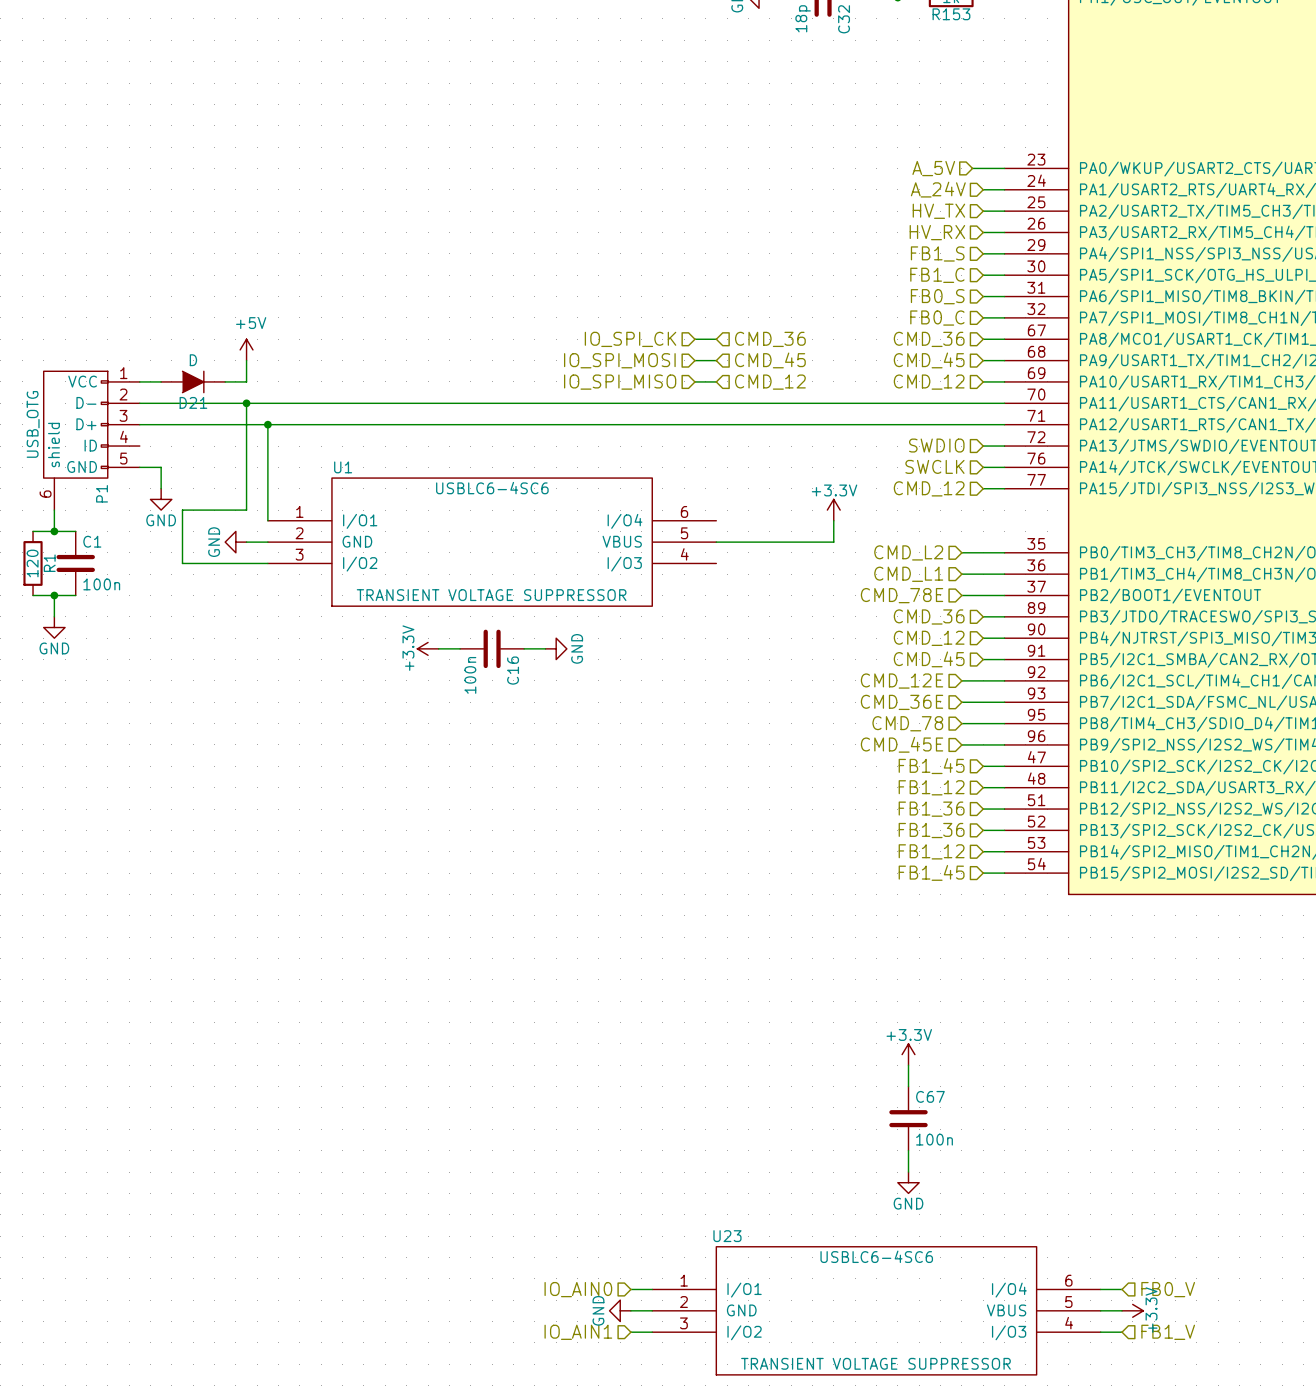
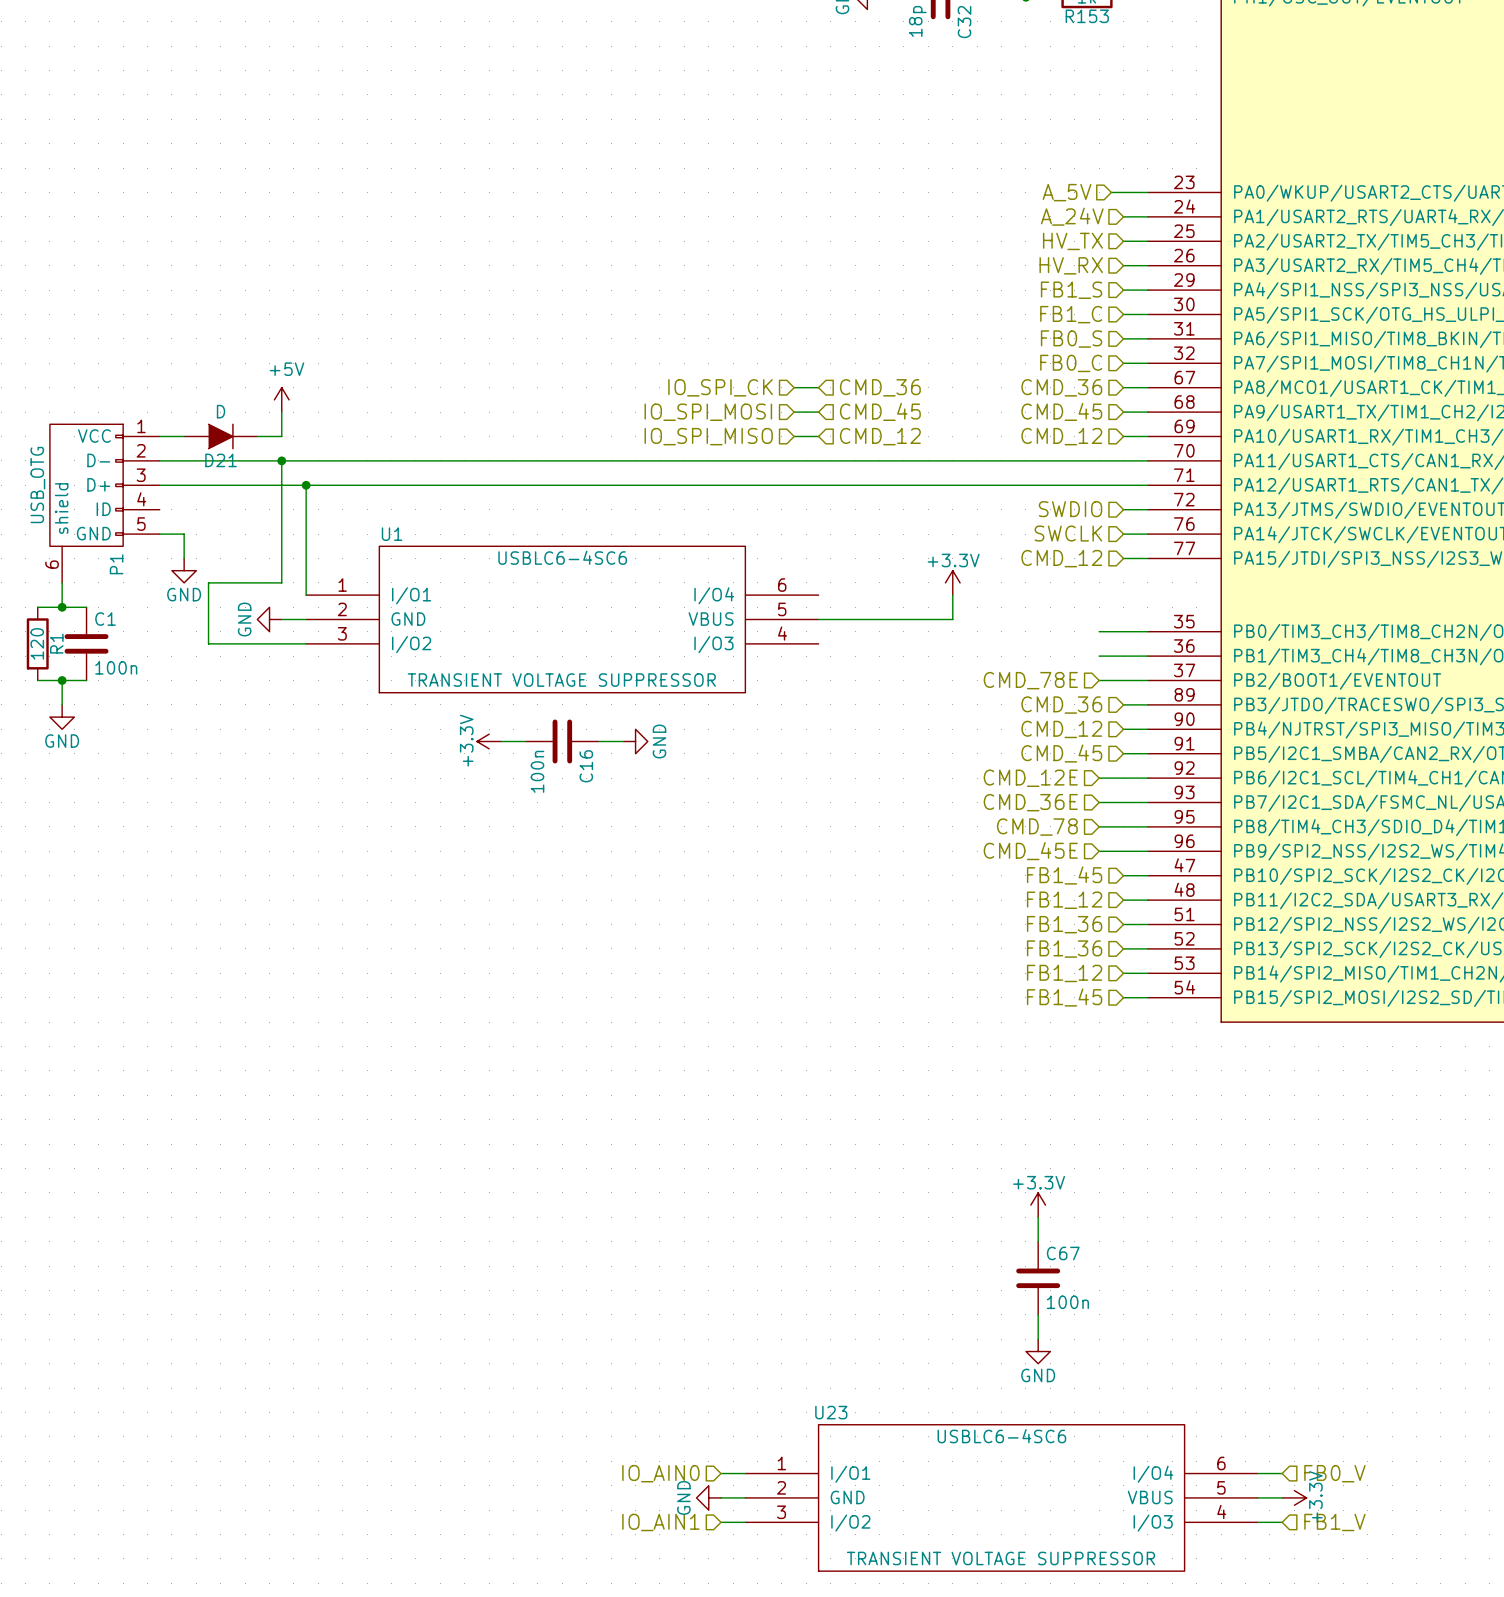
hierarchical label: CMD_L2 (908, 552) -> none
hierarchical label: CMD_L1 (908, 574) -> none

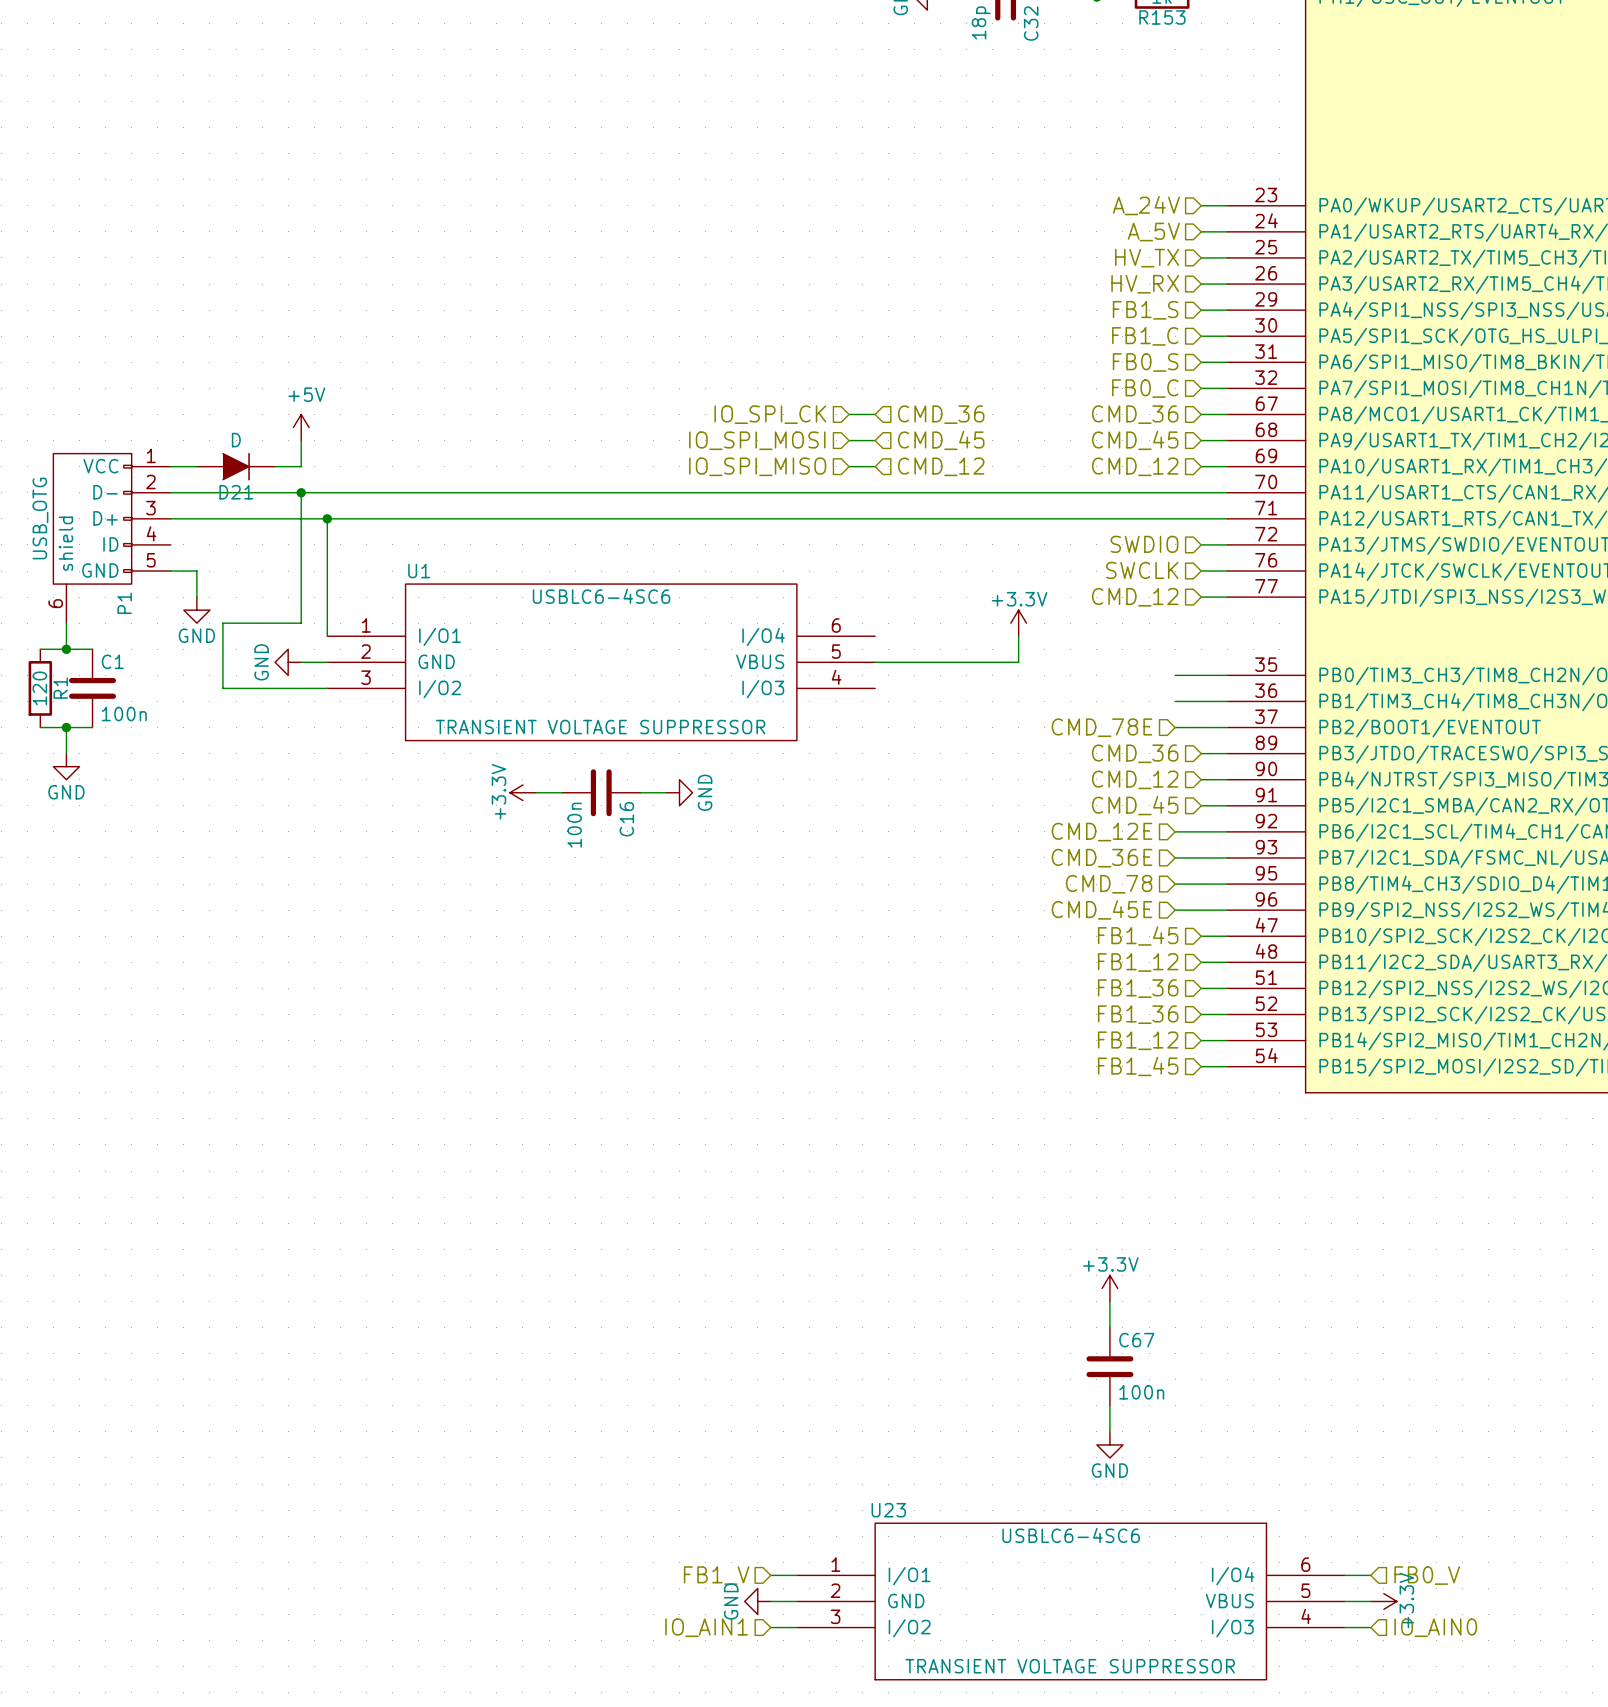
hierarchical label: A_5V (1067, 192) -> A_24V (1146, 205)
wire: (1111, 192) (1123, 192) -> none
hierarchical label: A_24V (1072, 216) -> A_5V (1153, 232)
hierarchical label: IO_AIN0 (660, 1473) -> FB1_V (716, 1575)
hierarchical label: FB1_V (1334, 1522) -> IO_AIN0 (1435, 1627)

